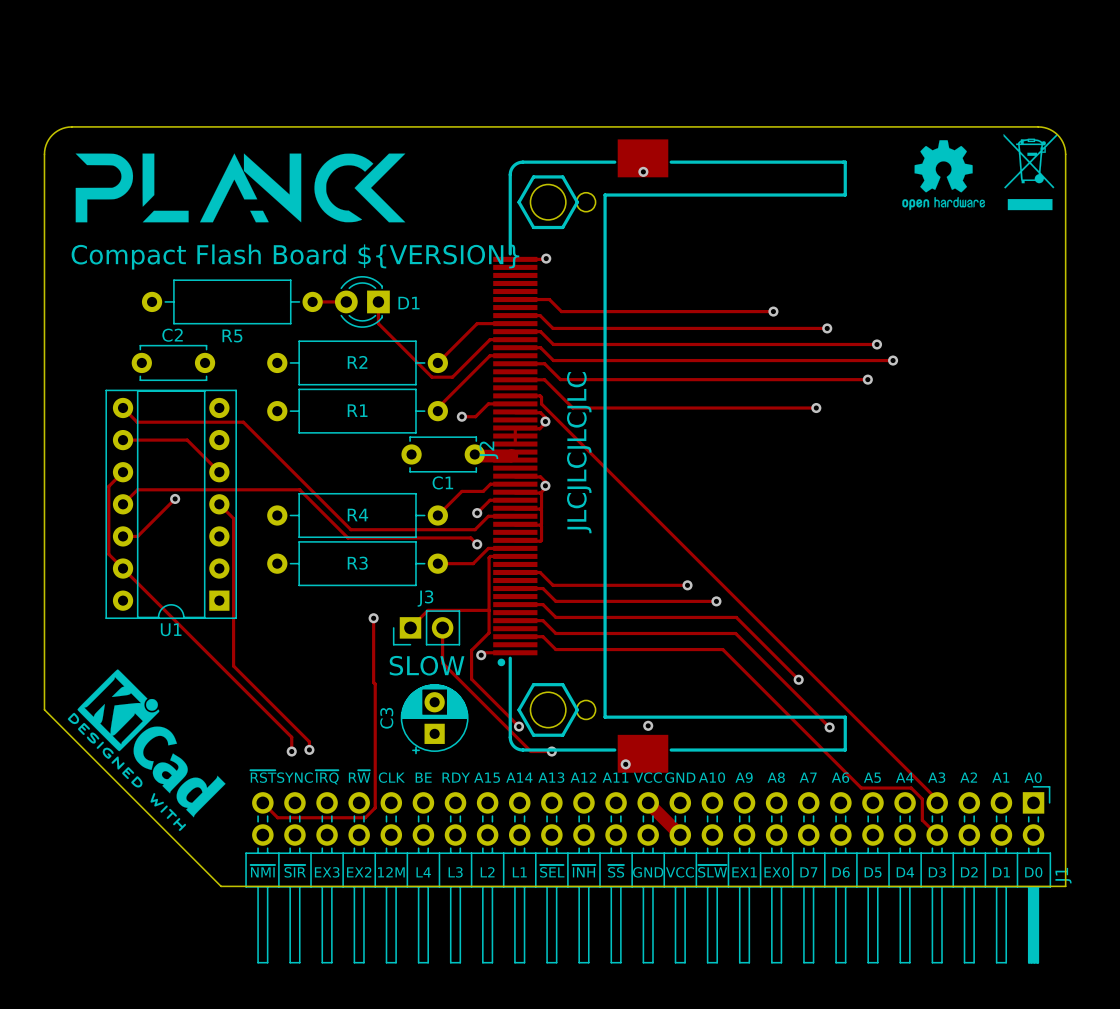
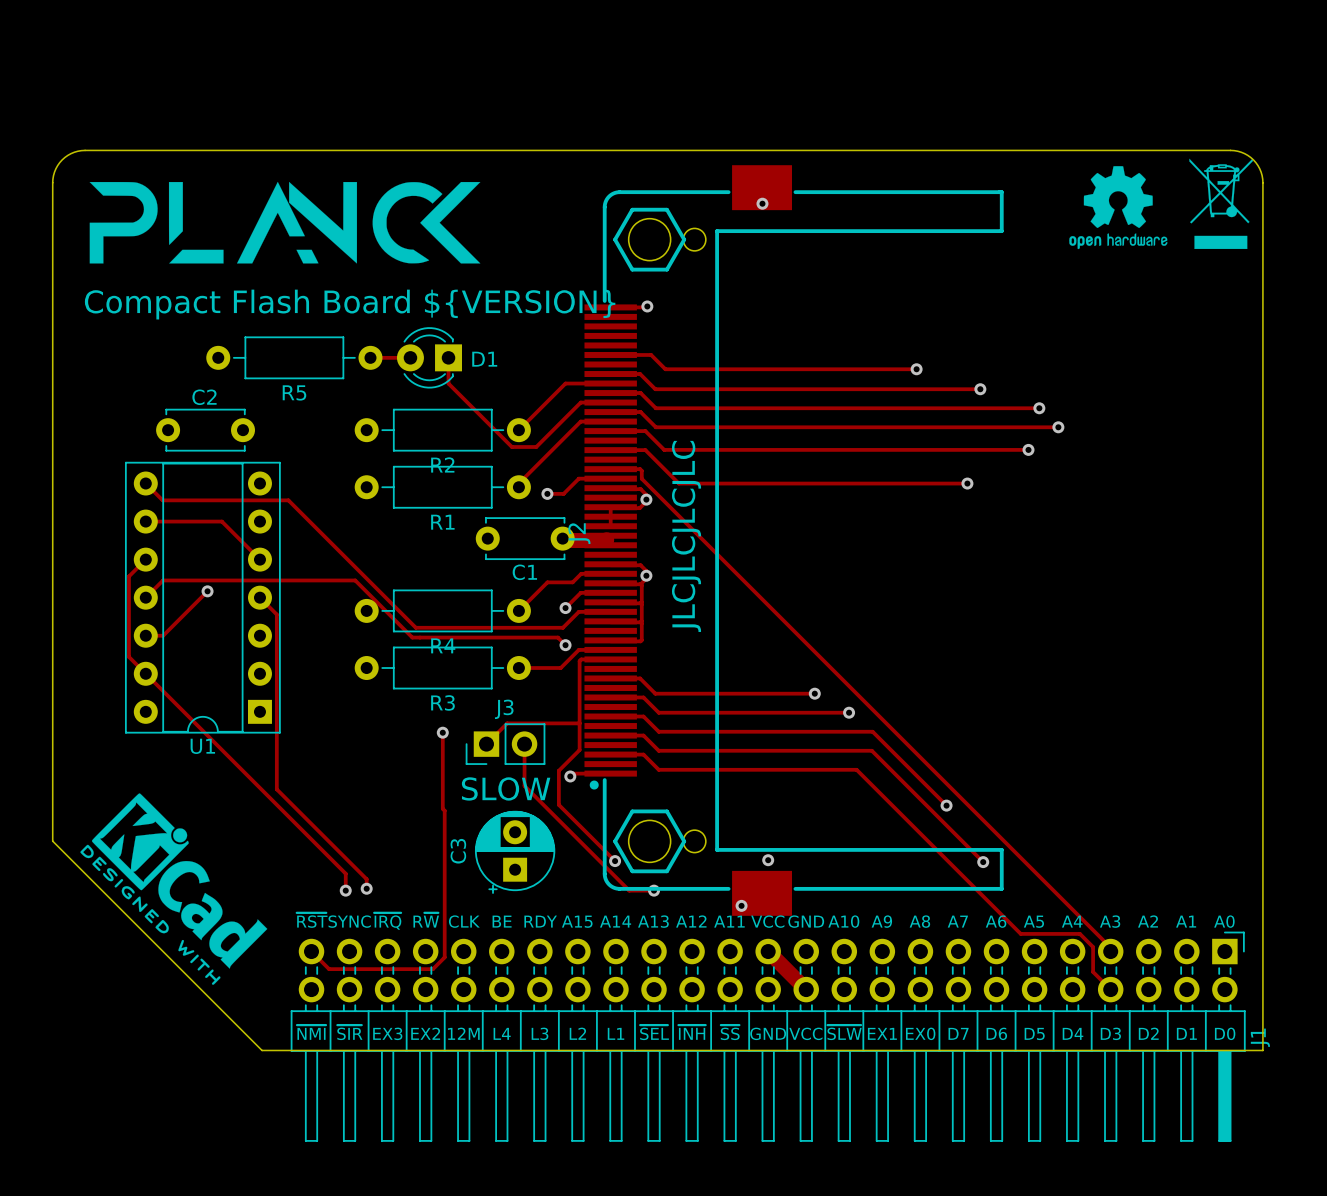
R5 footprint: [141, 279, 323, 325] -> [206, 336, 383, 380]
R2 footprint: [267, 340, 448, 386] -> [354, 408, 531, 452]
R2 name position: R2 (357, 362) -> R2 (442, 464)
R1 footprint: [267, 388, 448, 434] -> [354, 465, 531, 509]
R1 name position: R1 (357, 410) -> R1 (442, 522)
R4 footprint: [267, 492, 448, 538] -> [354, 589, 531, 633]
R4 name position: R4 (357, 515) -> R4 (443, 645)
R3 footprint: [267, 541, 448, 587] -> [354, 646, 531, 690]
R3 name position: R3 (357, 563) -> R3 (442, 702)

